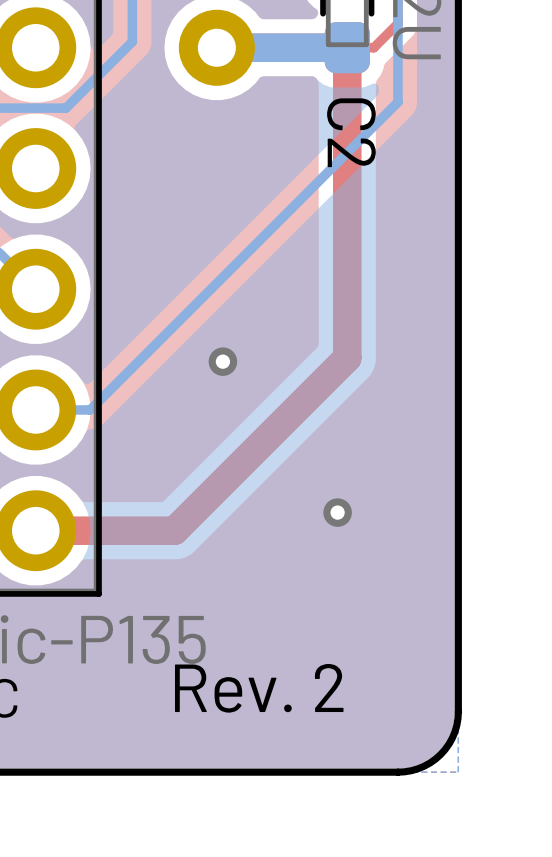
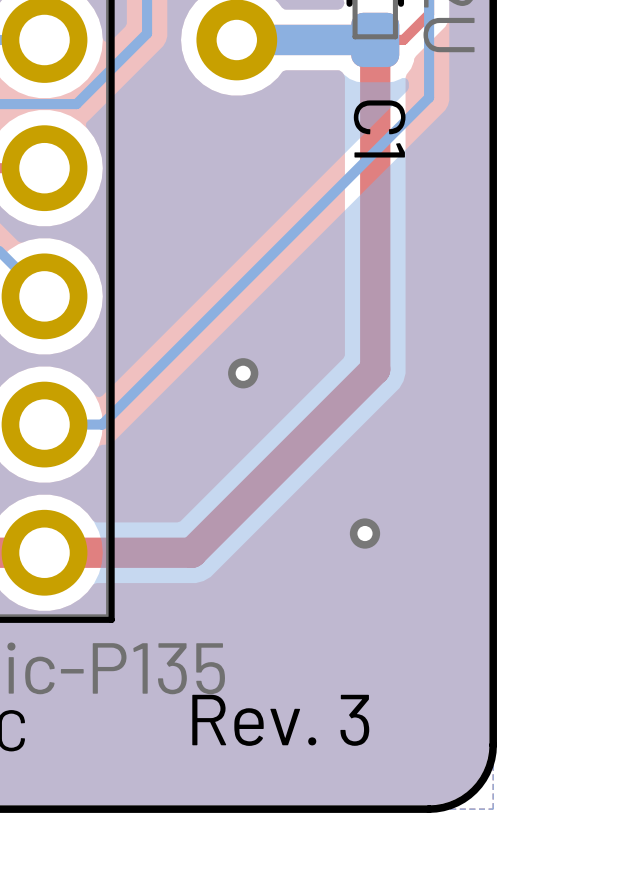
C2 name: C2 (351, 132) -> C1 (379, 128)
text: Rev. 2 (259, 688) -> Rev. 3 (280, 720)

